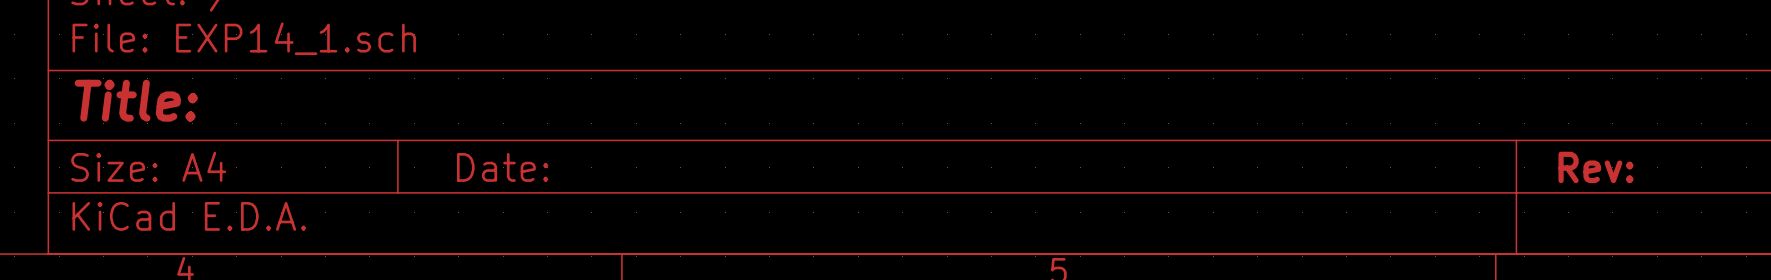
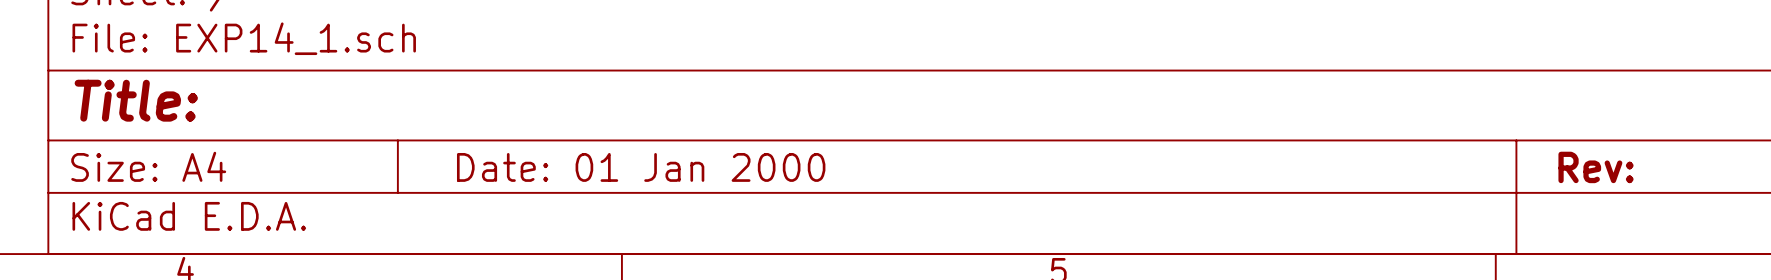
title block: Date: (502, 167) -> Date: 01 Jan 2000 (641, 167)

